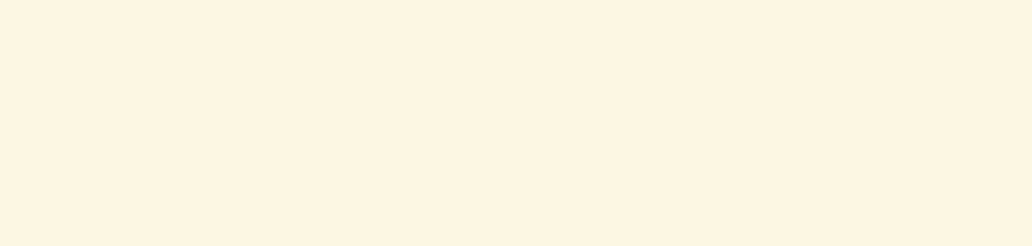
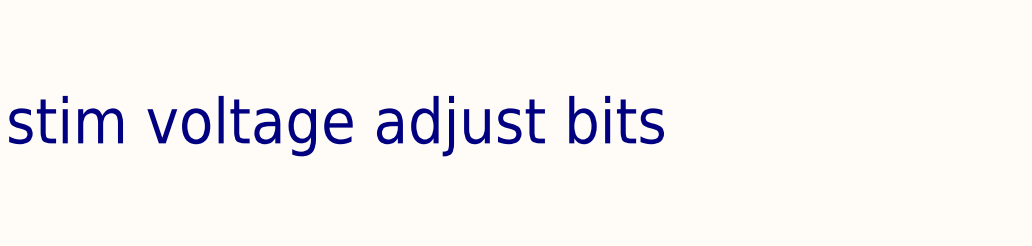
text: none -> stim voltage adjust bits (336, 126)

